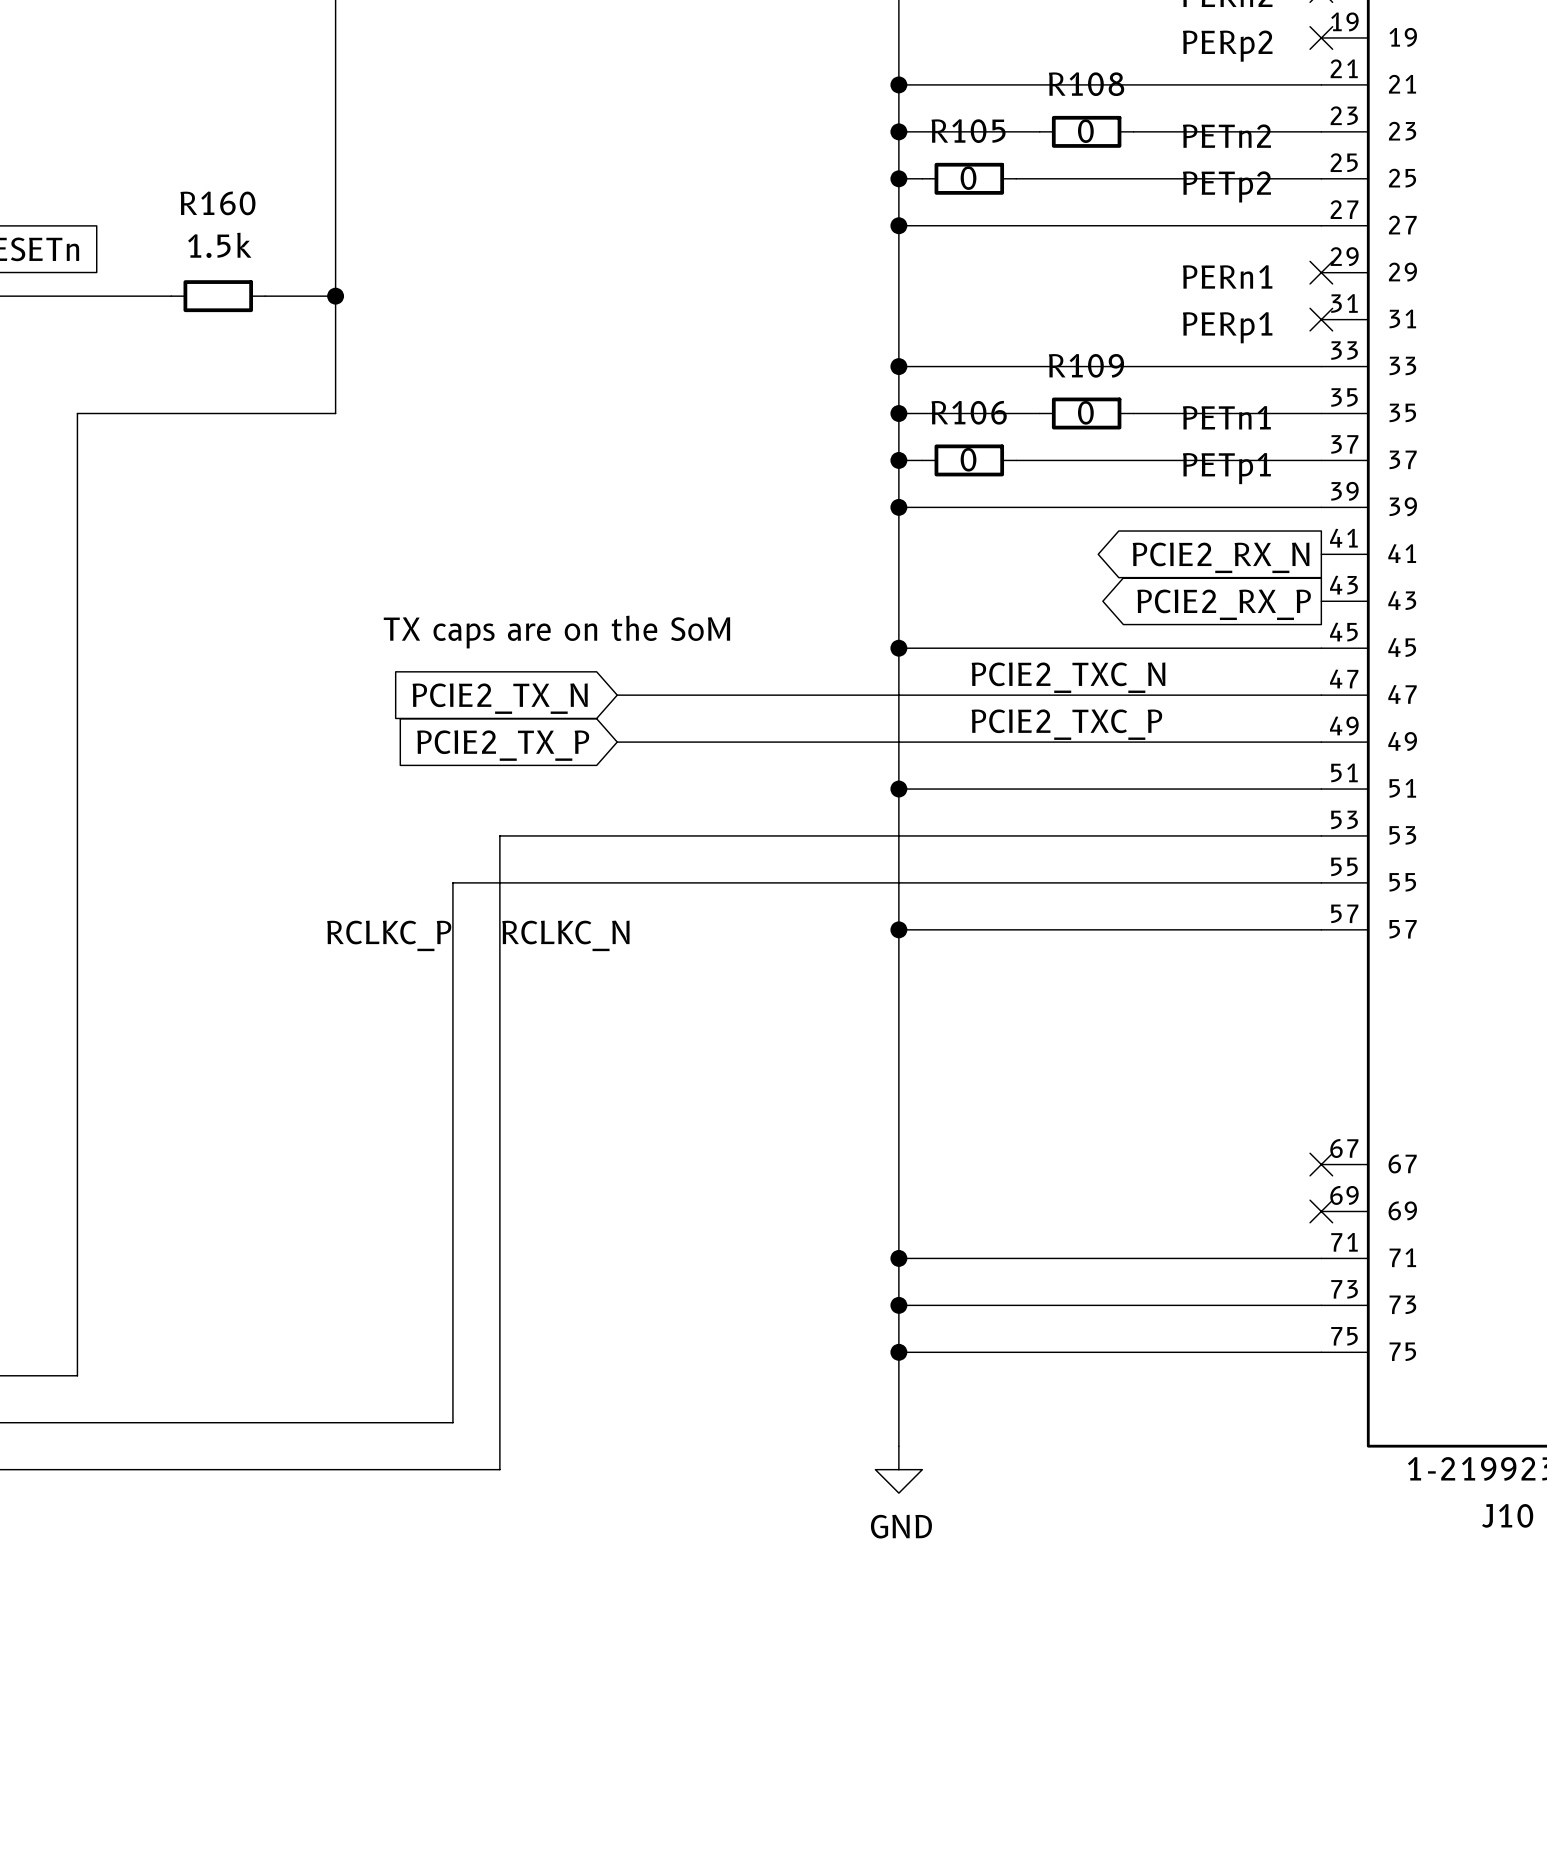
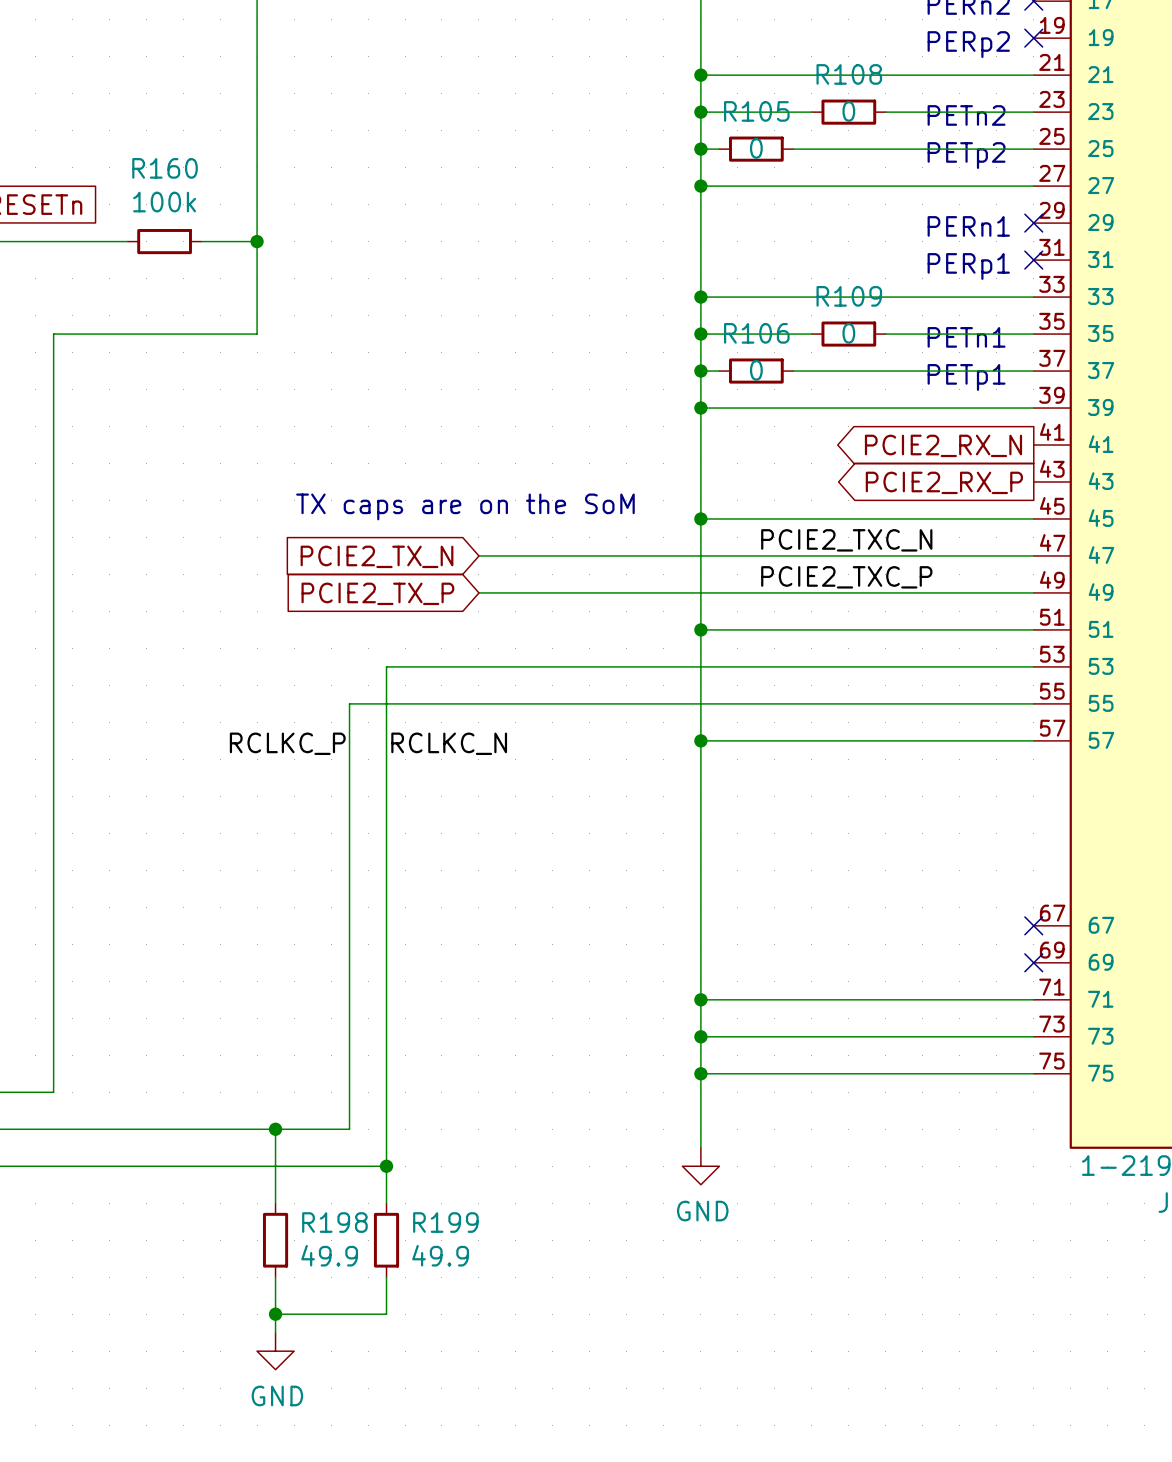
R160 value: 1.5k (219, 245) -> 100k (164, 202)
wire: none -> (275, 1129) (275, 1203)
junction: none -> (275, 1129)
wire: none -> (386, 1166) (386, 1203)
junction: none -> (386, 1166)
R198: none -> 49.9 (275, 1240)
R199: none -> 49.9 (386, 1240)
wire: none -> (275, 1277) (275, 1332)
wire: none -> (386, 1277) (386, 1314) (275, 1314)
junction: none -> (275, 1314)
power symbol: none -> GND (275, 1351)

